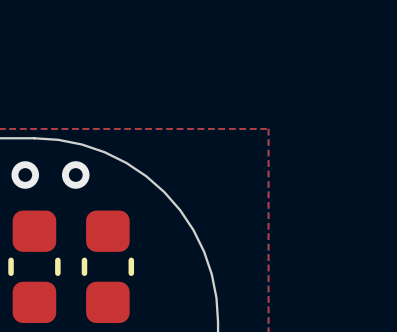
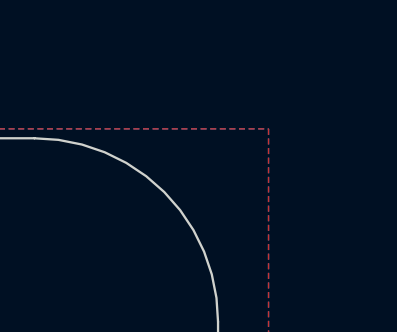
via: (25, 174) -> none
via: (75, 174) -> none
part: (34, 266) -> none
part: (107, 266) -> none

